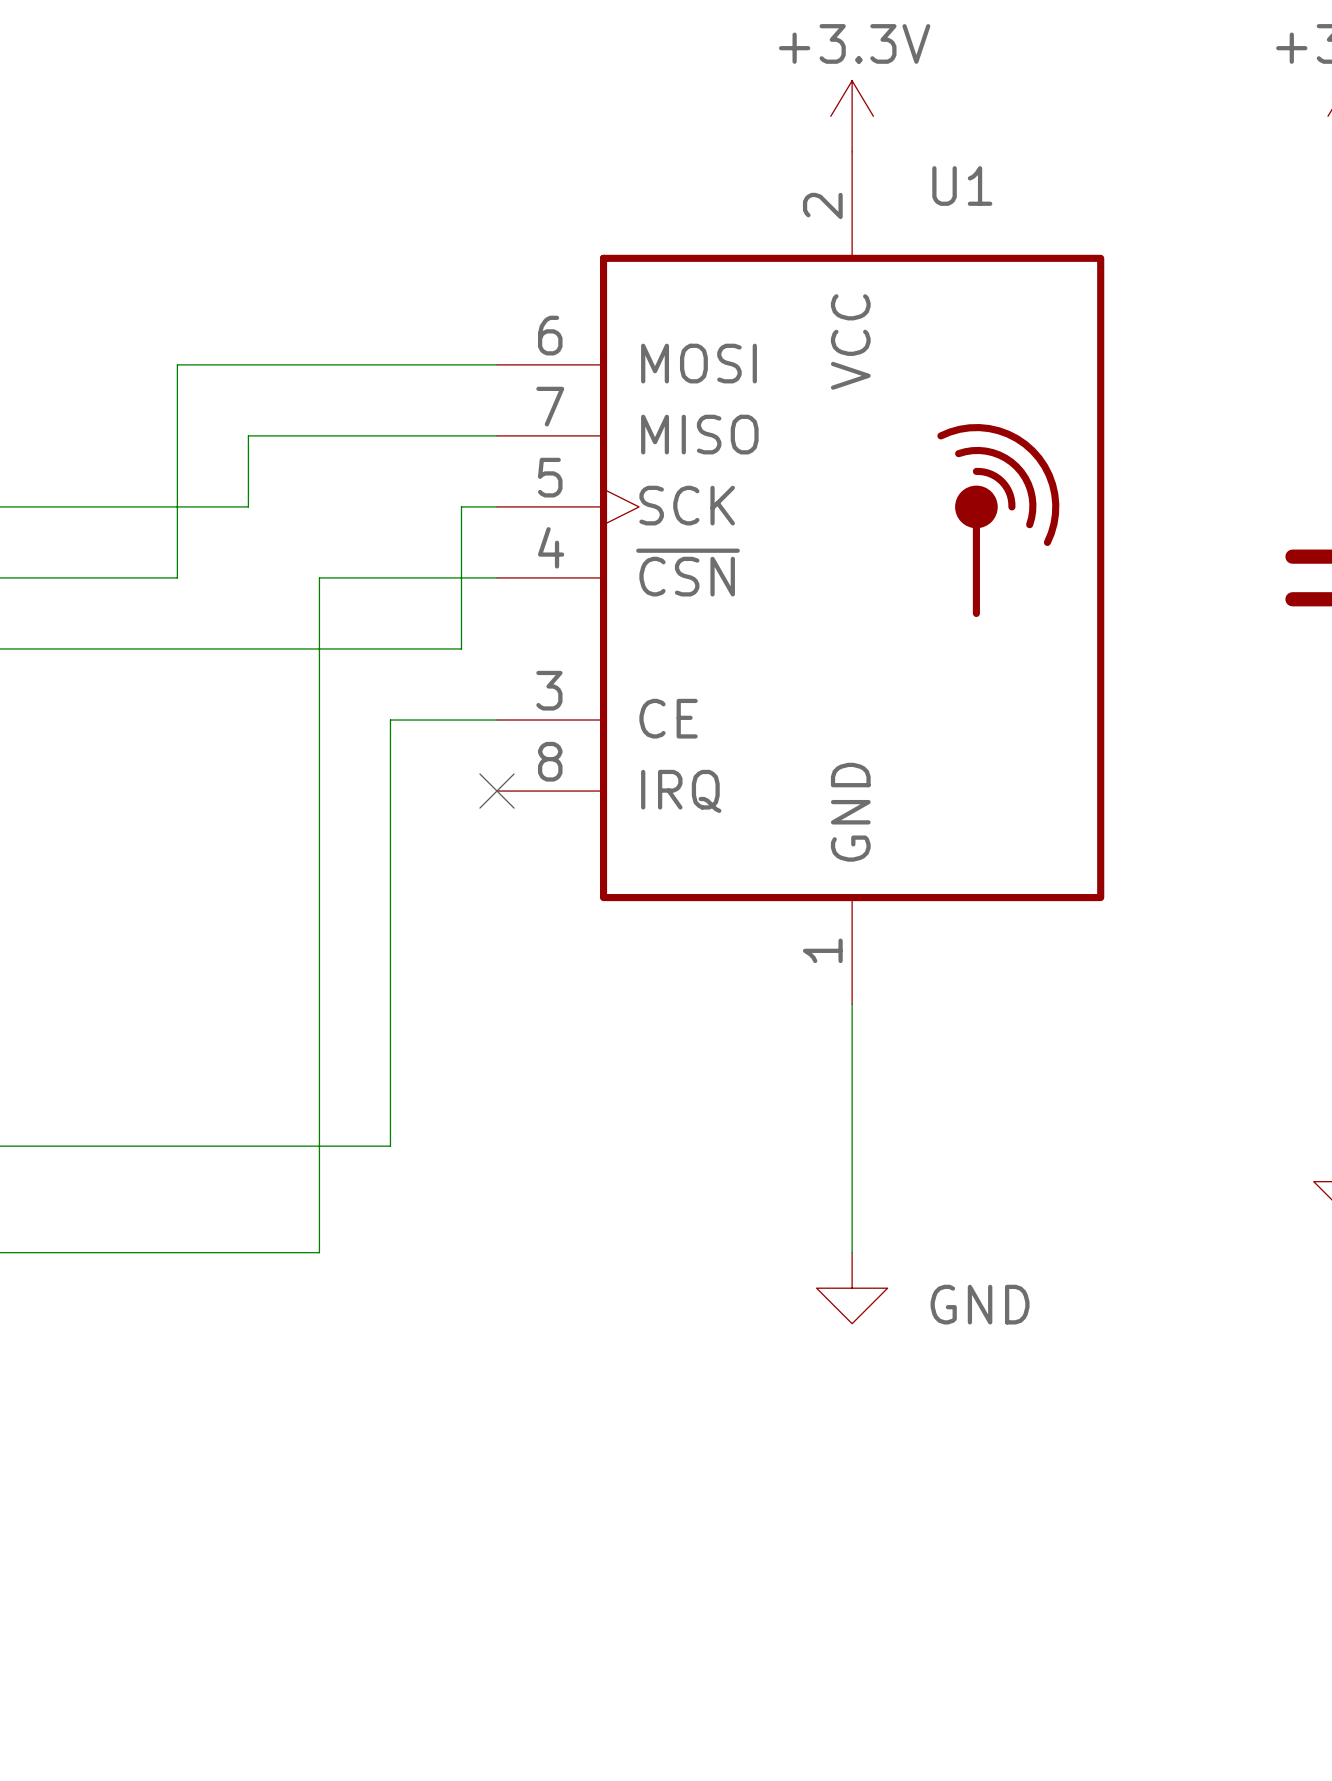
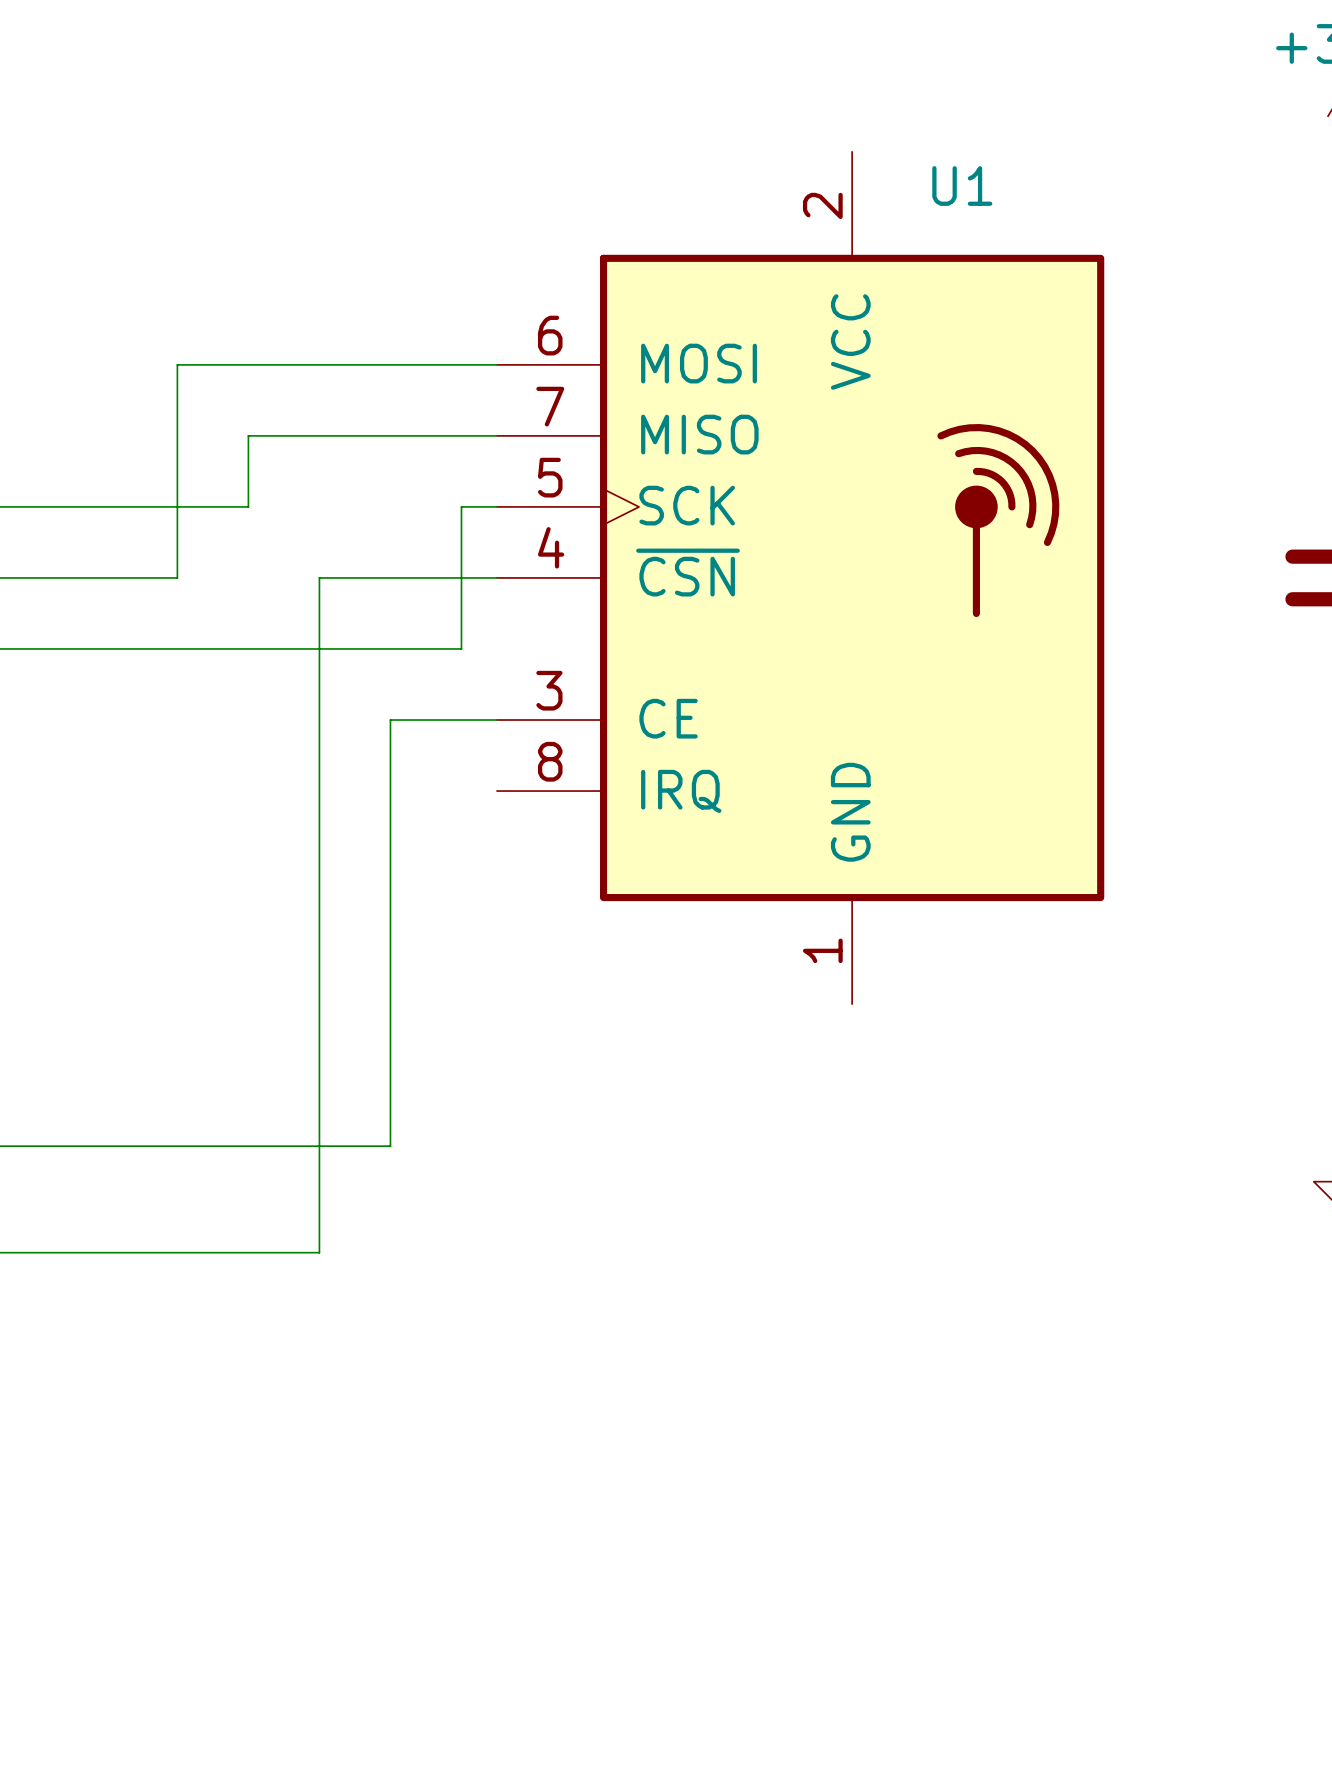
power symbol: +3.3V (852, 116) -> none
no-connect mark: (496, 791) -> none
wire: (852, 1004) (852, 1252) -> none
power symbol: GND (852, 1288) -> none

